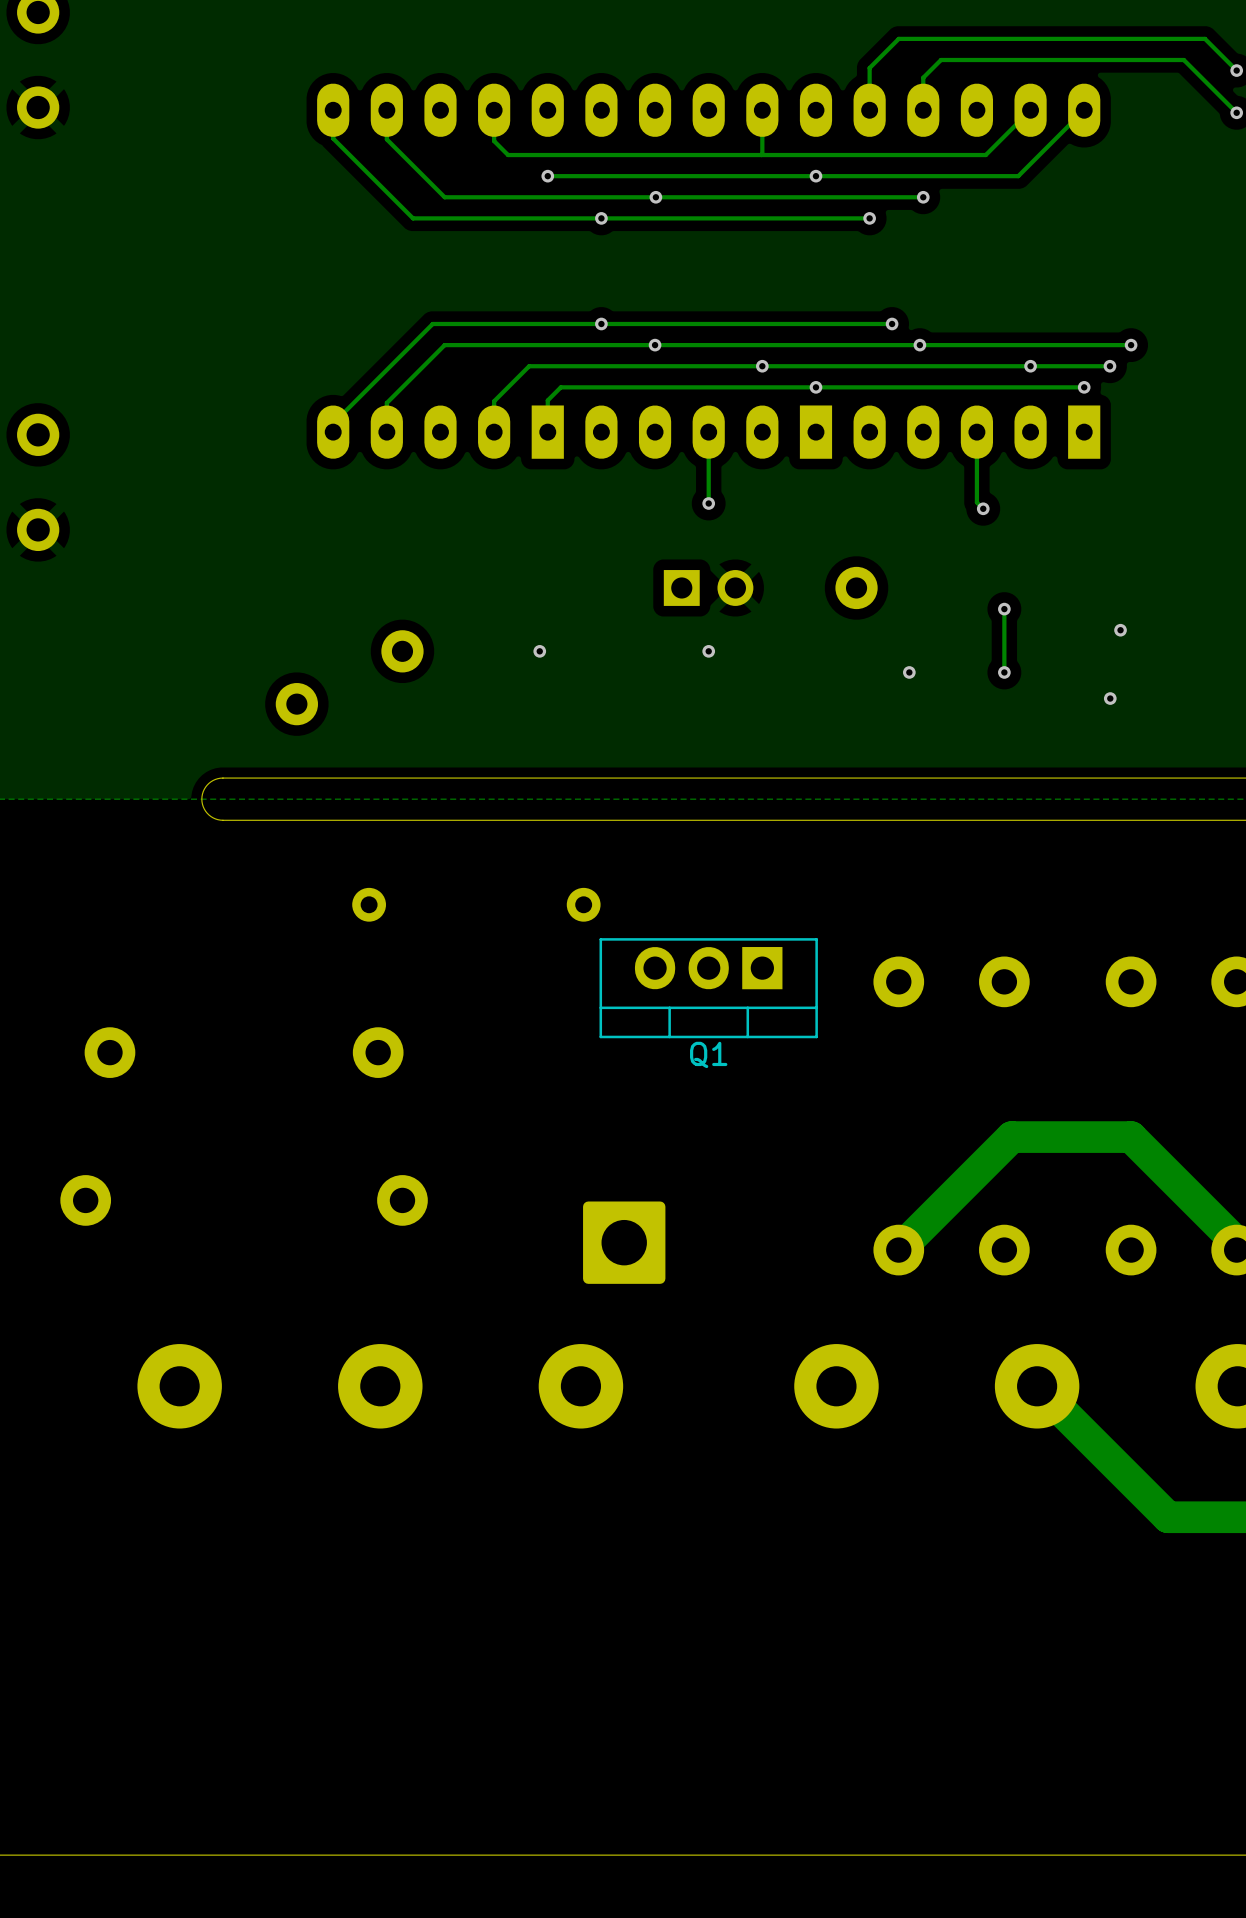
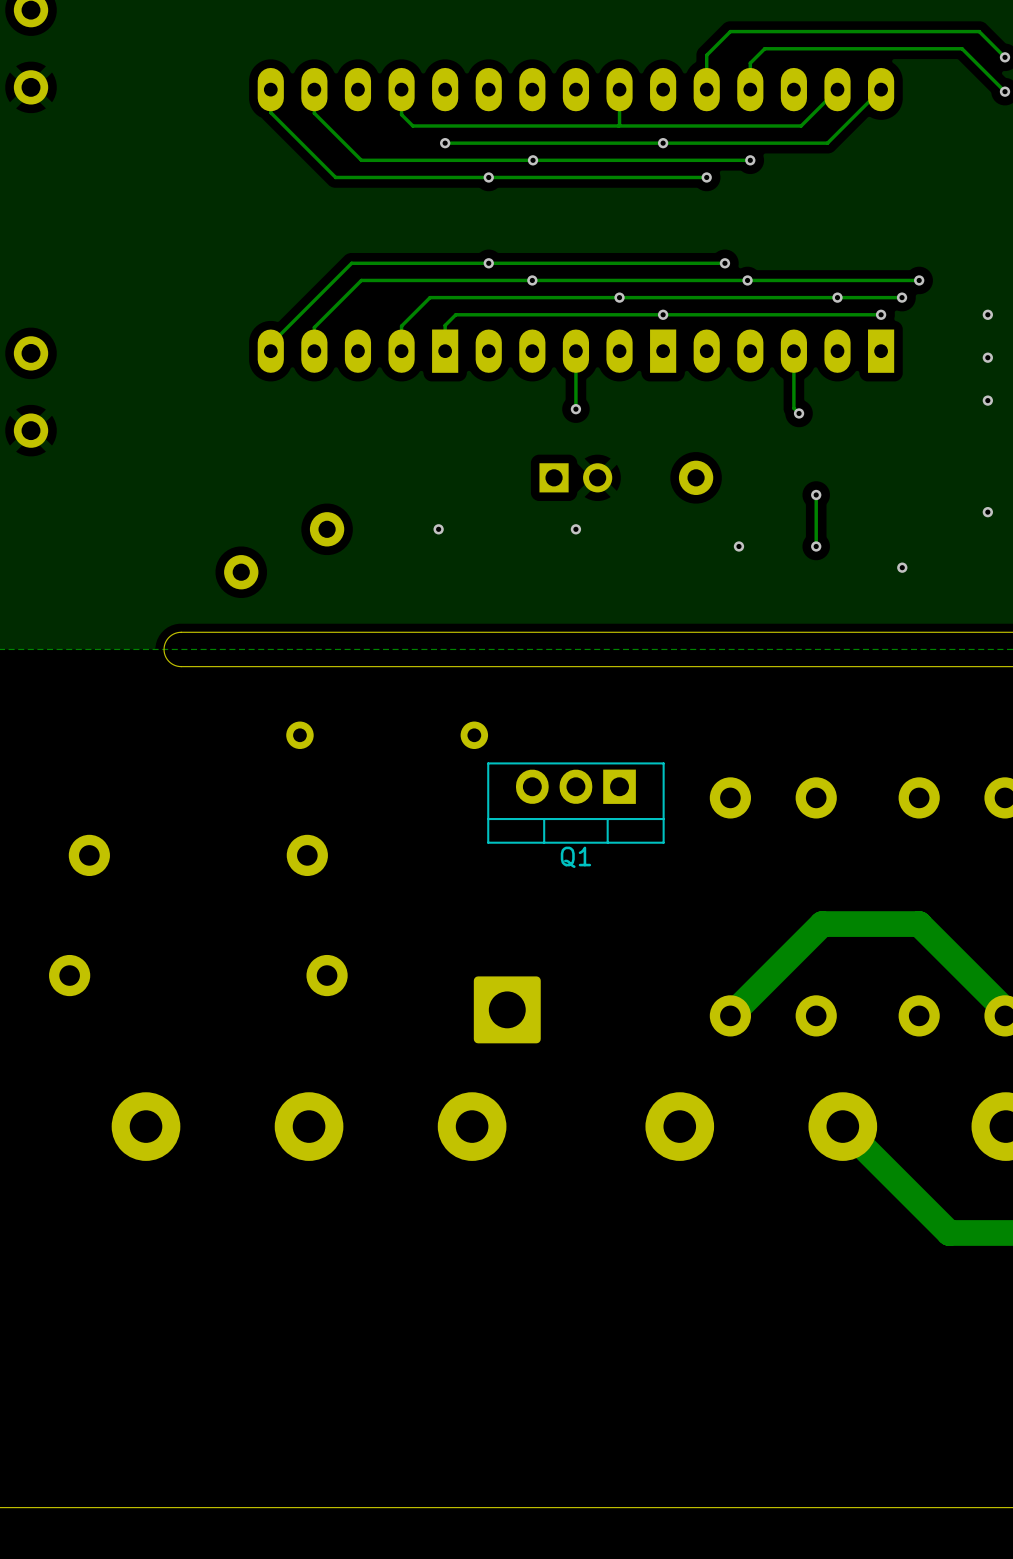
via: none -> (987, 314)
via: none -> (987, 357)
via: none -> (987, 400)
via: (1120, 630) -> none
via: none -> (987, 512)

